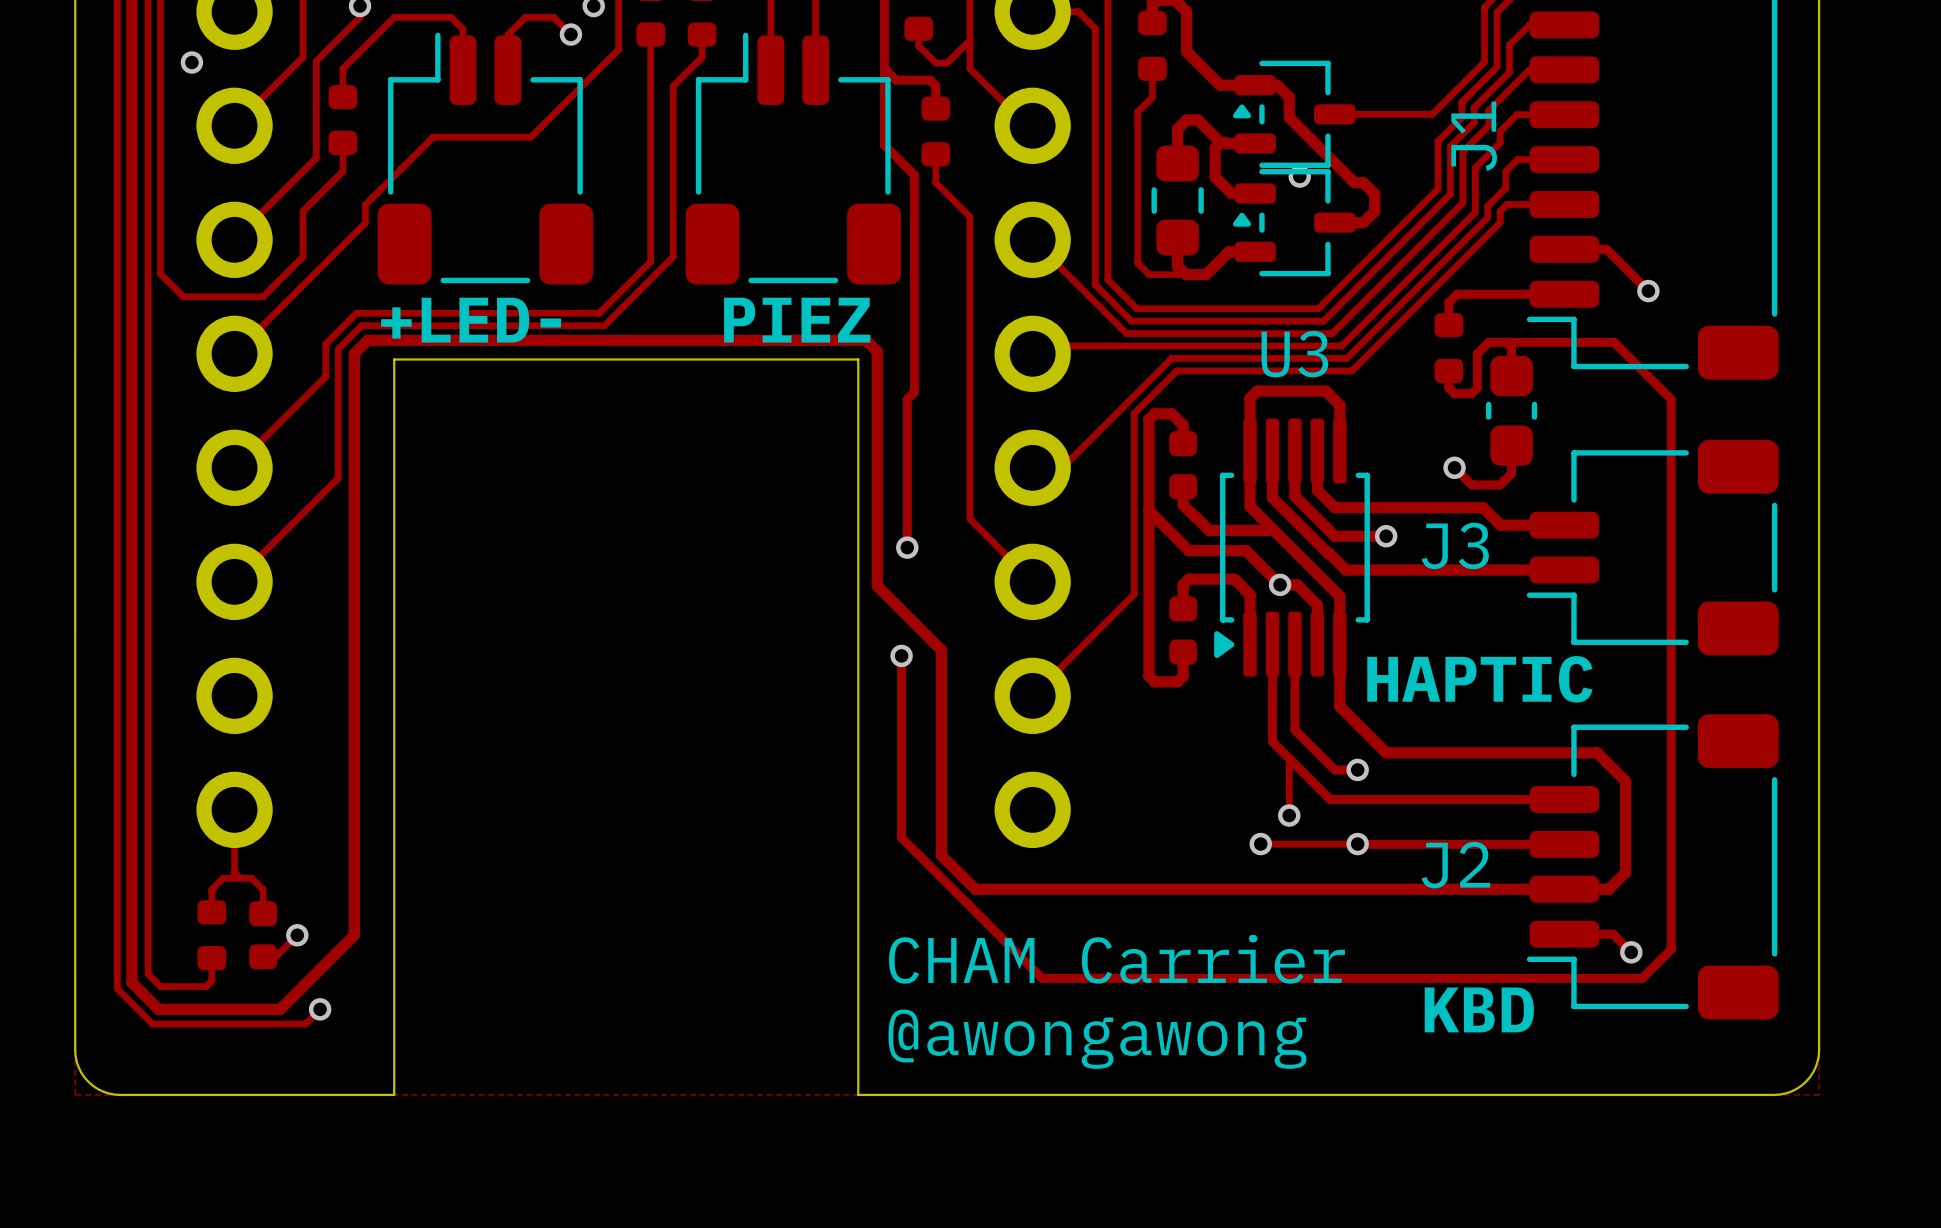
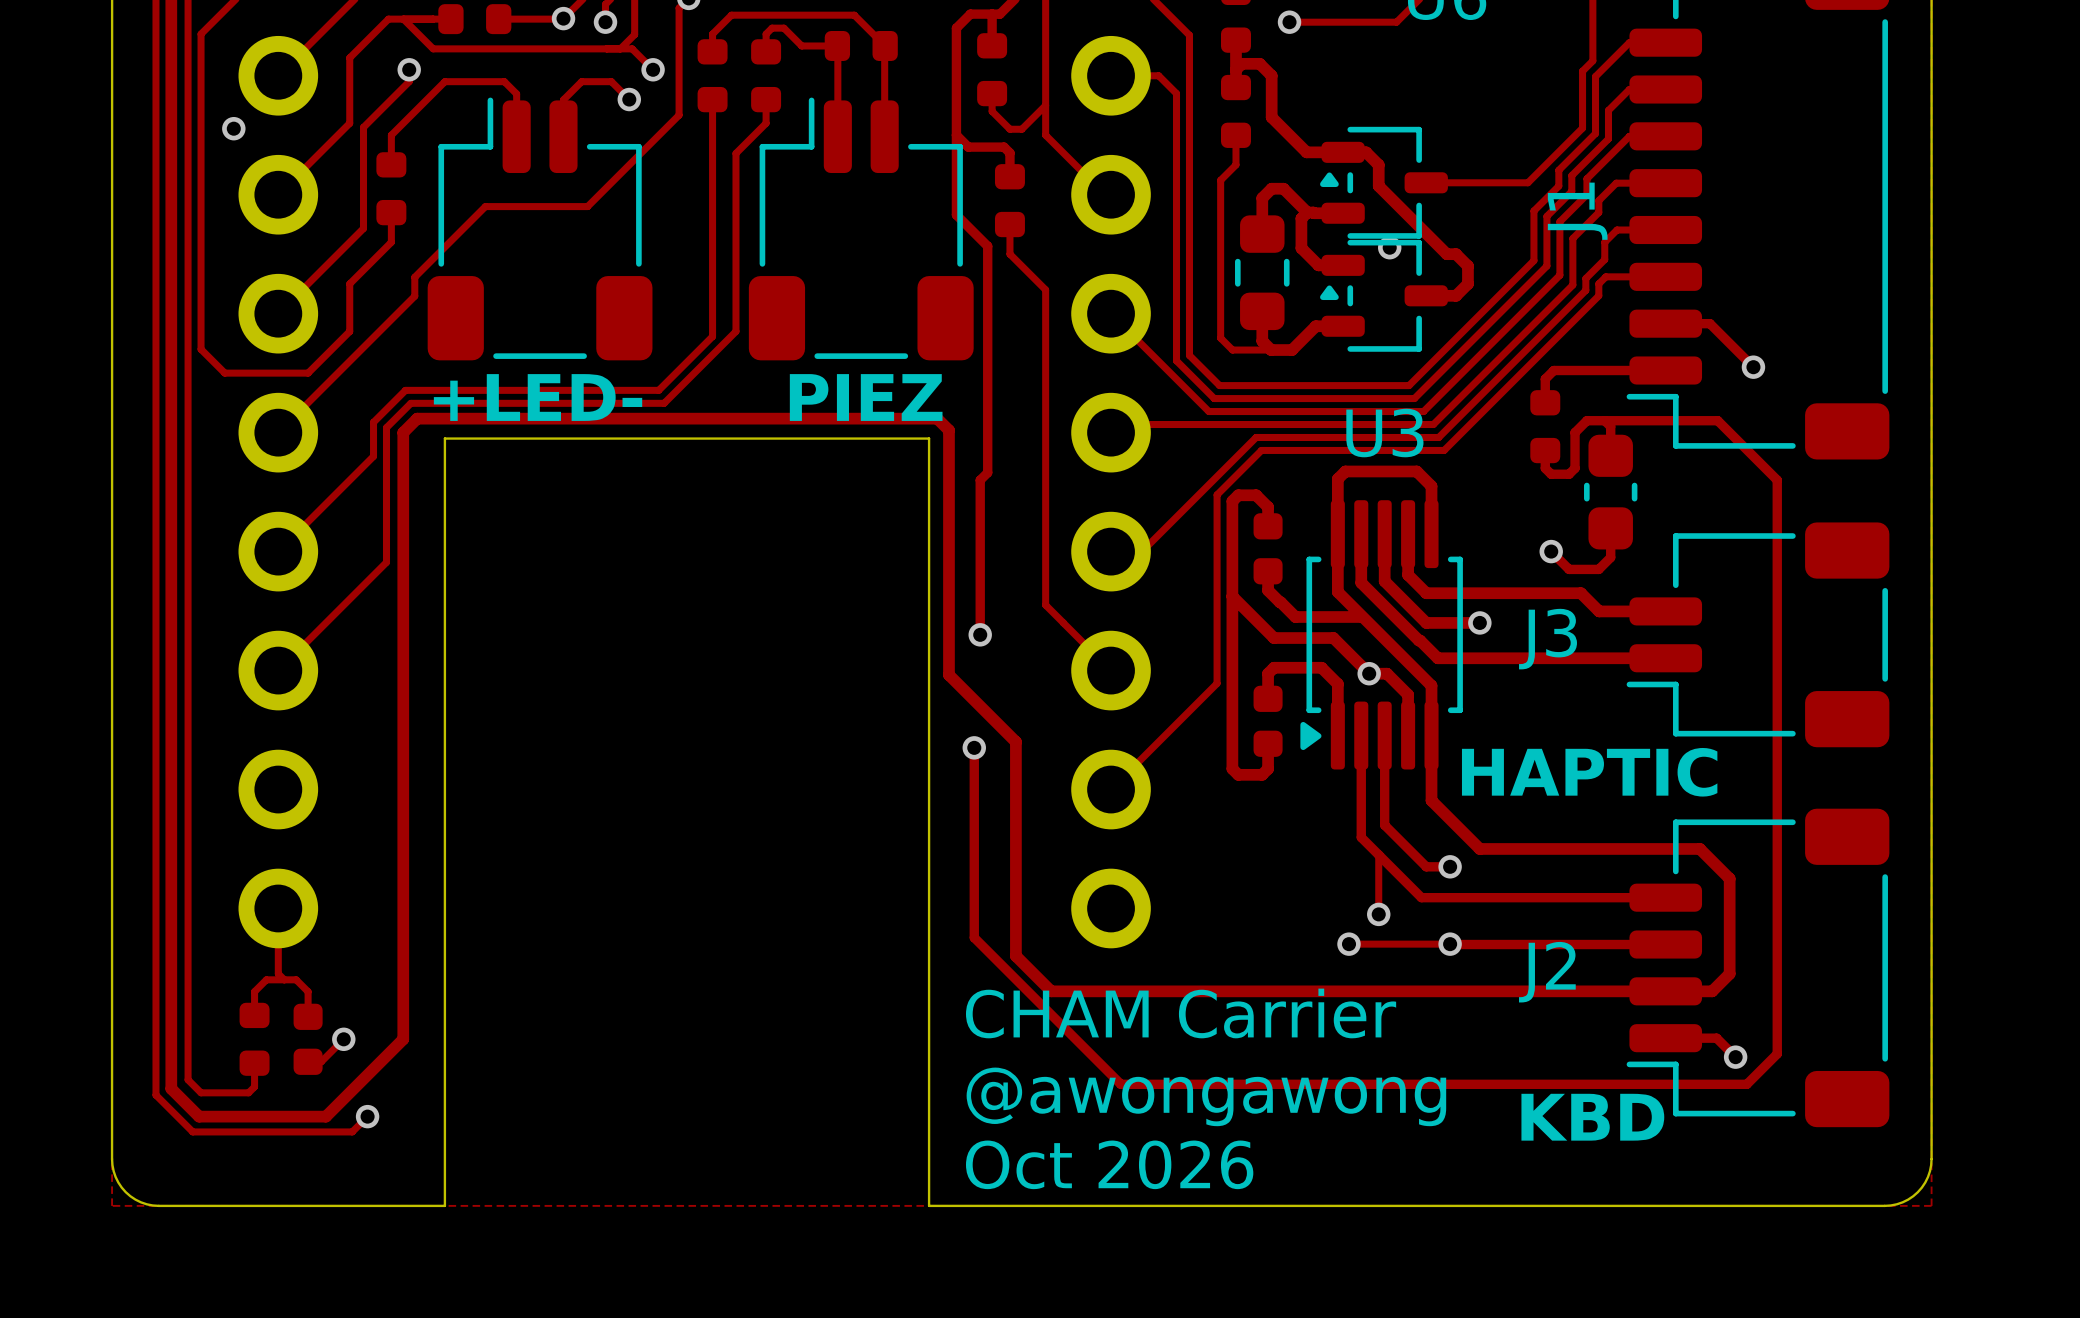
text: none -> CHAM Carrier (1181, 1013)
text: CHAM Carrier (1116, 959) -> @awongawong (1206, 1096)
text: @awongawong (1097, 1039) -> Oct 2026 (1109, 1164)

